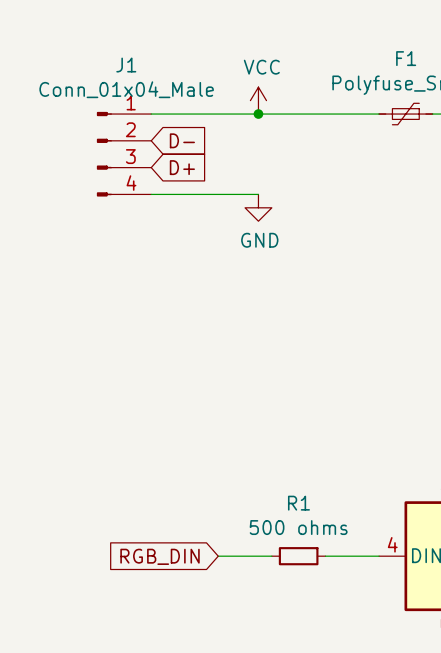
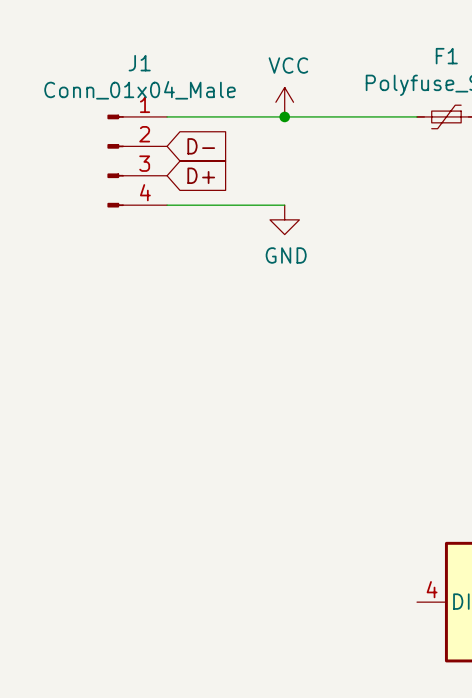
global label: RGB_DIN (160, 556) -> none
wire: (218, 556) (271, 556) -> none
R1: 500 ohms (298, 556) -> none
wire: (325, 556) (379, 556) -> none

